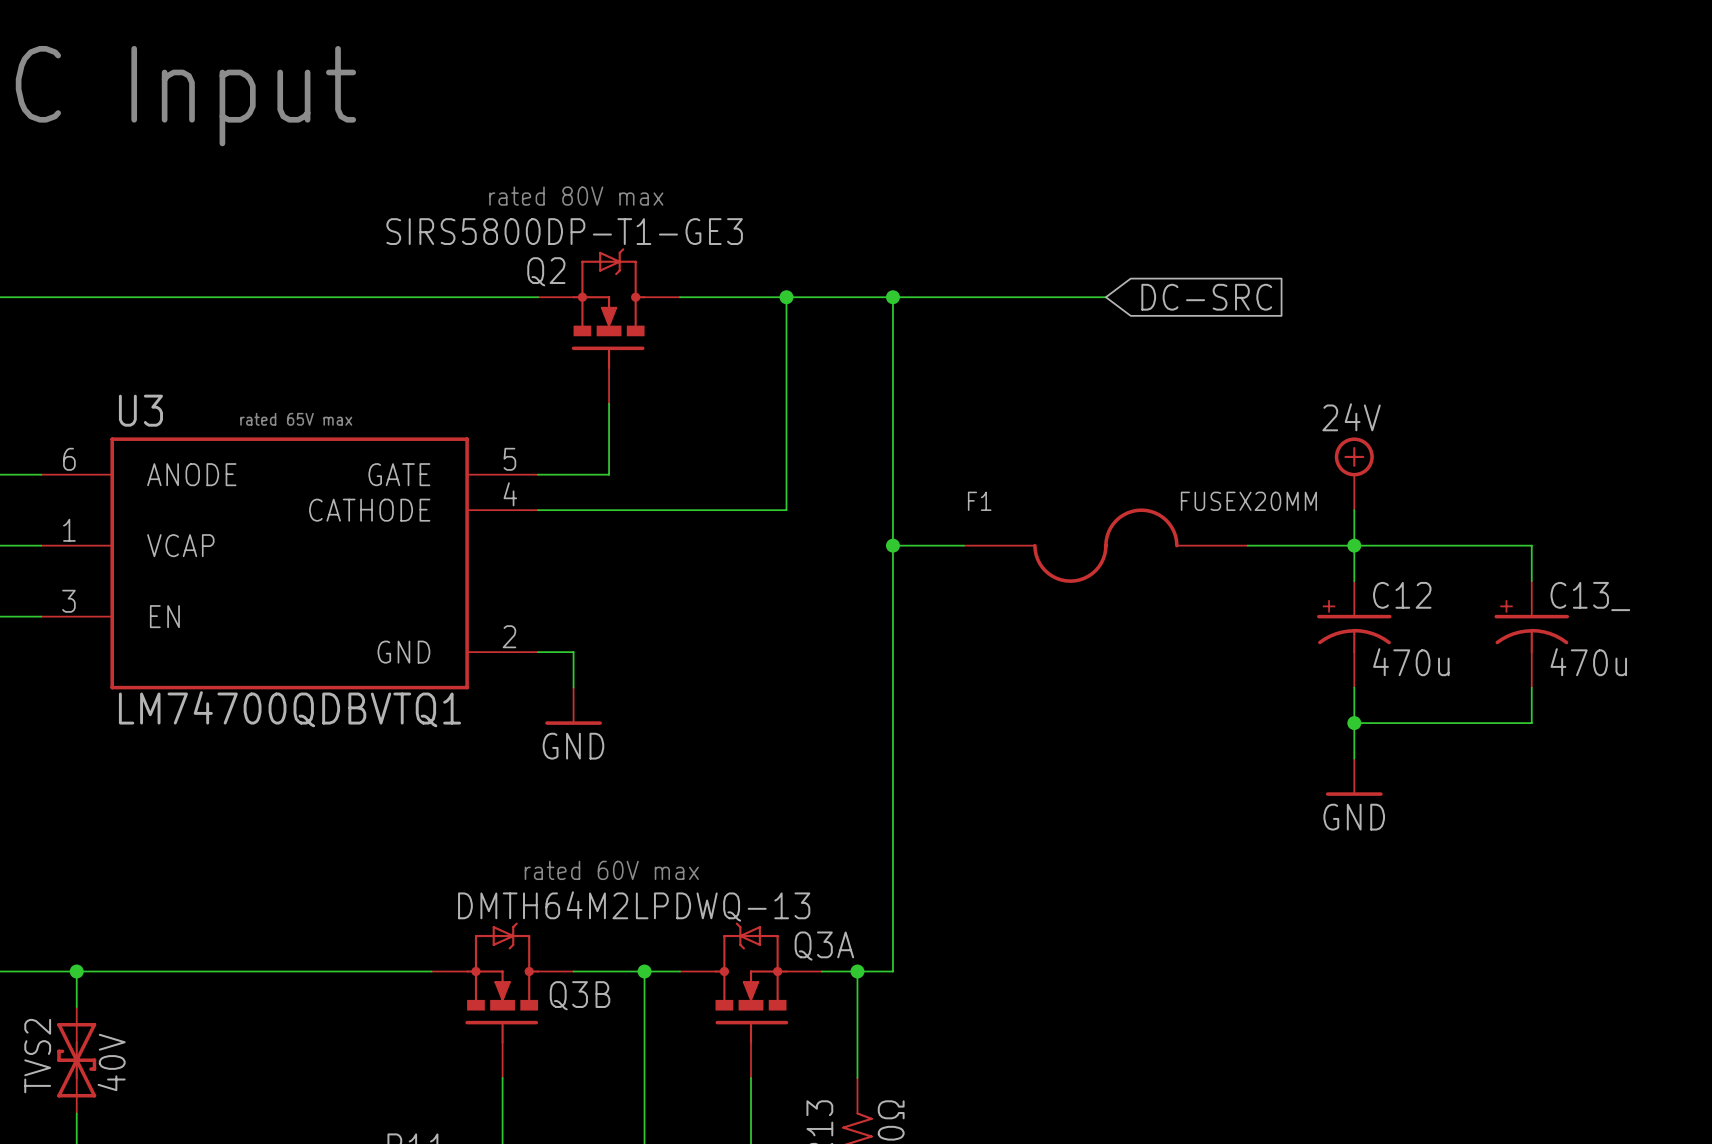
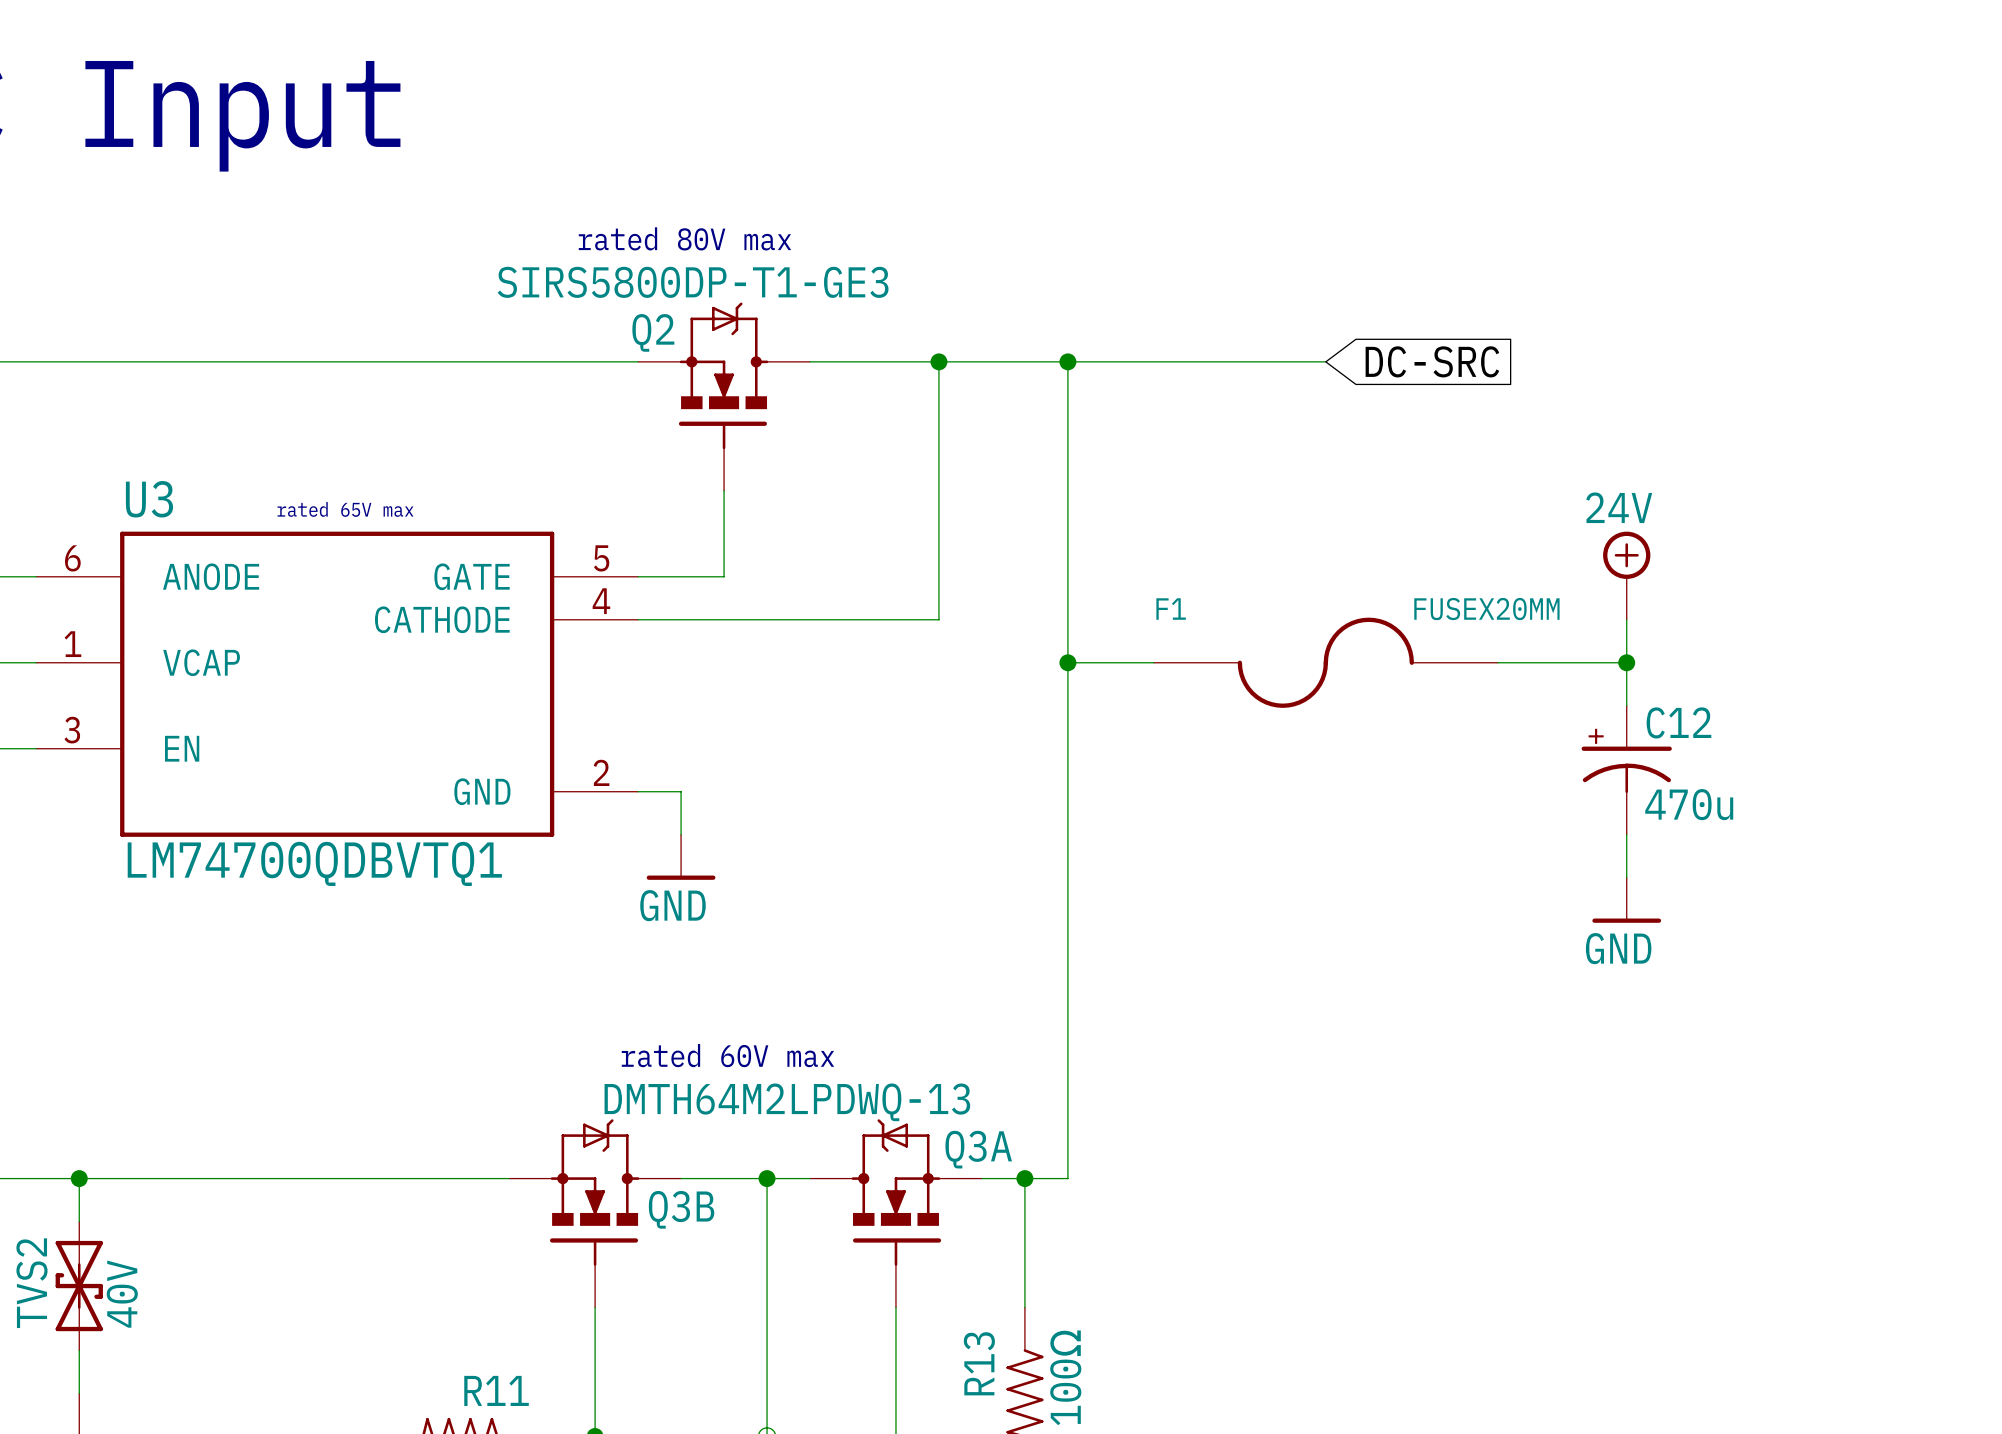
wire: (1354, 545) (1531, 545) (1531, 581) -> none
C13_: 470u (1531, 634) -> none
wire: (1531, 687) (1531, 723) (1354, 723) (1354, 758) -> none
junction: (1354, 723) -> none
power symbol position: GND (1354, 777) -> GND (1626, 900)

